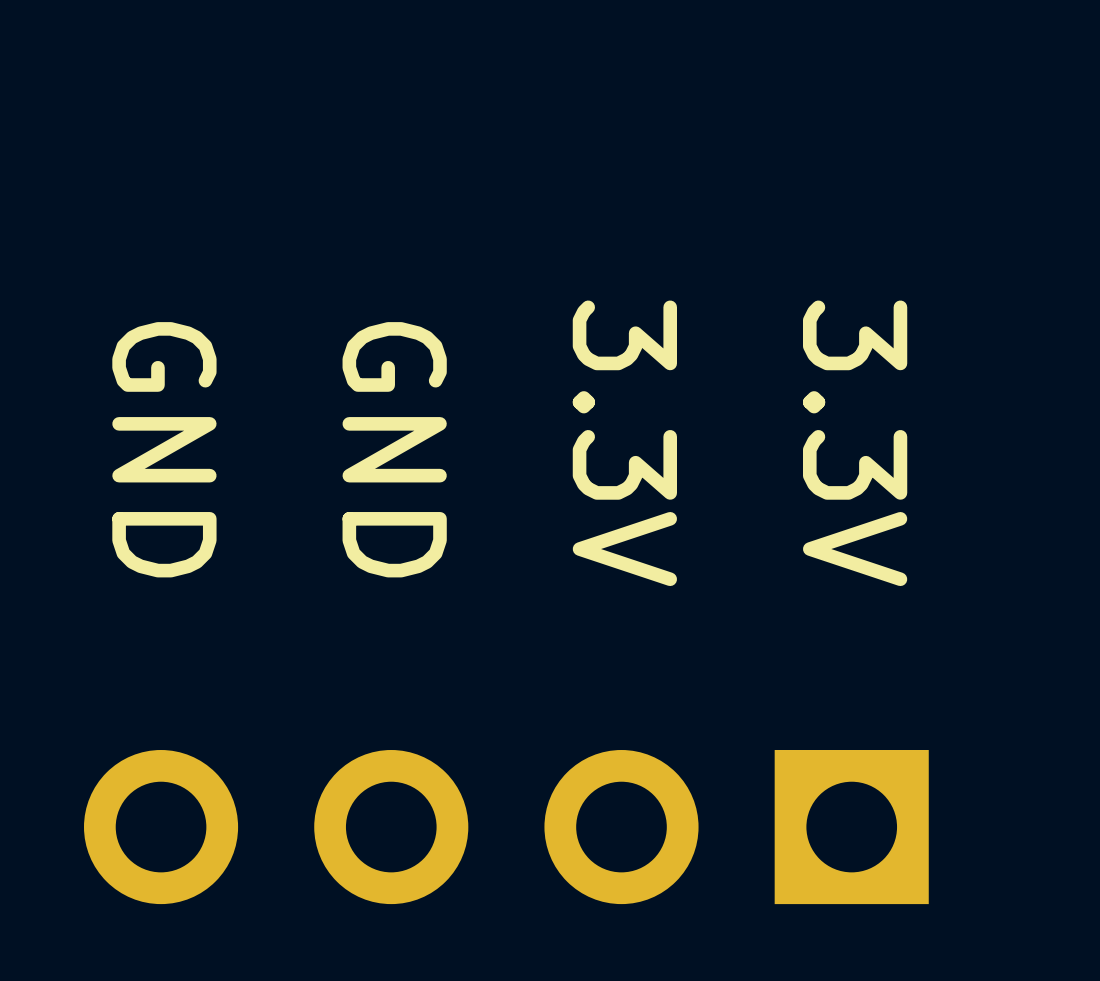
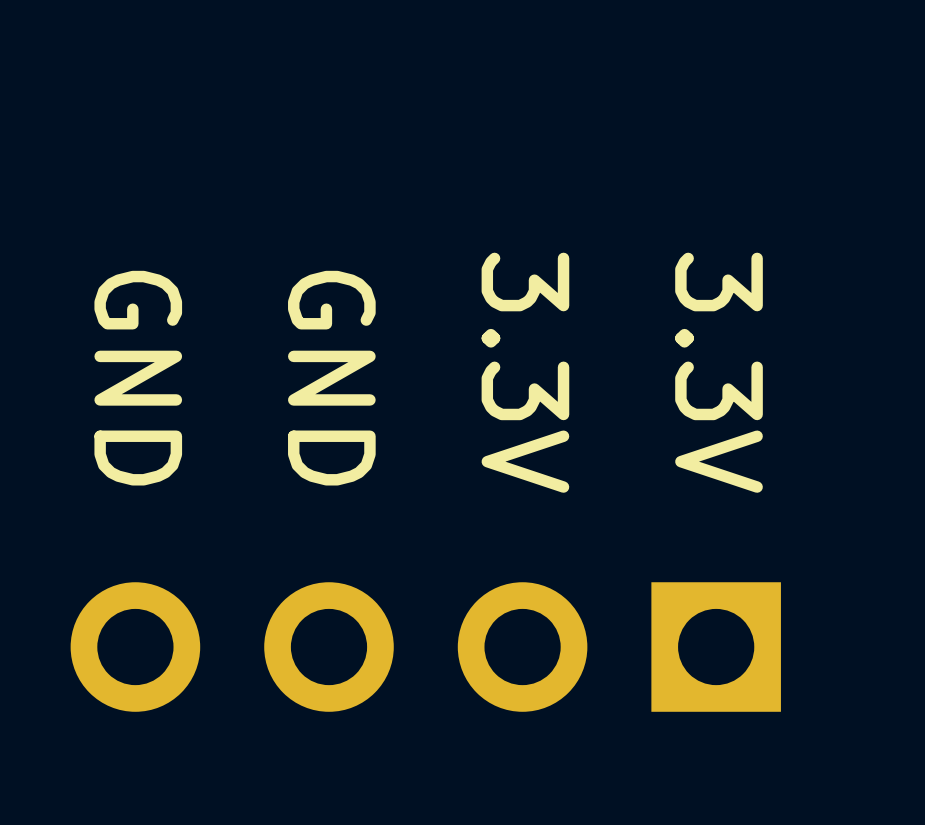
part position: (506, 827) -> (425, 647)

